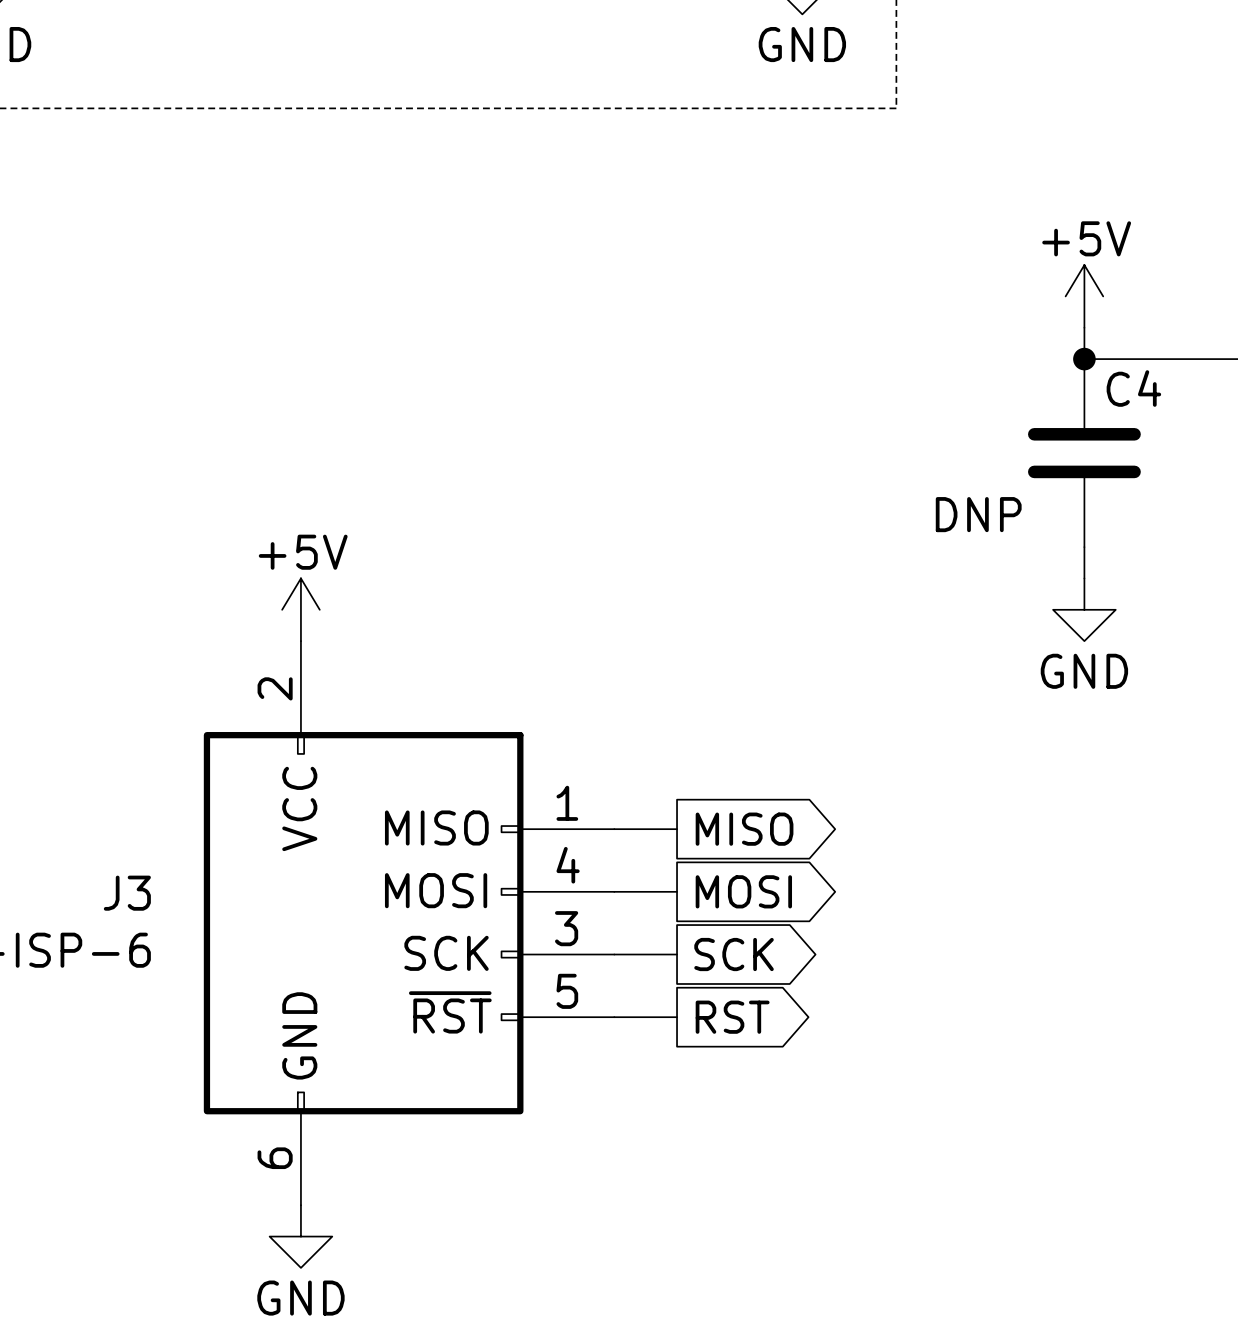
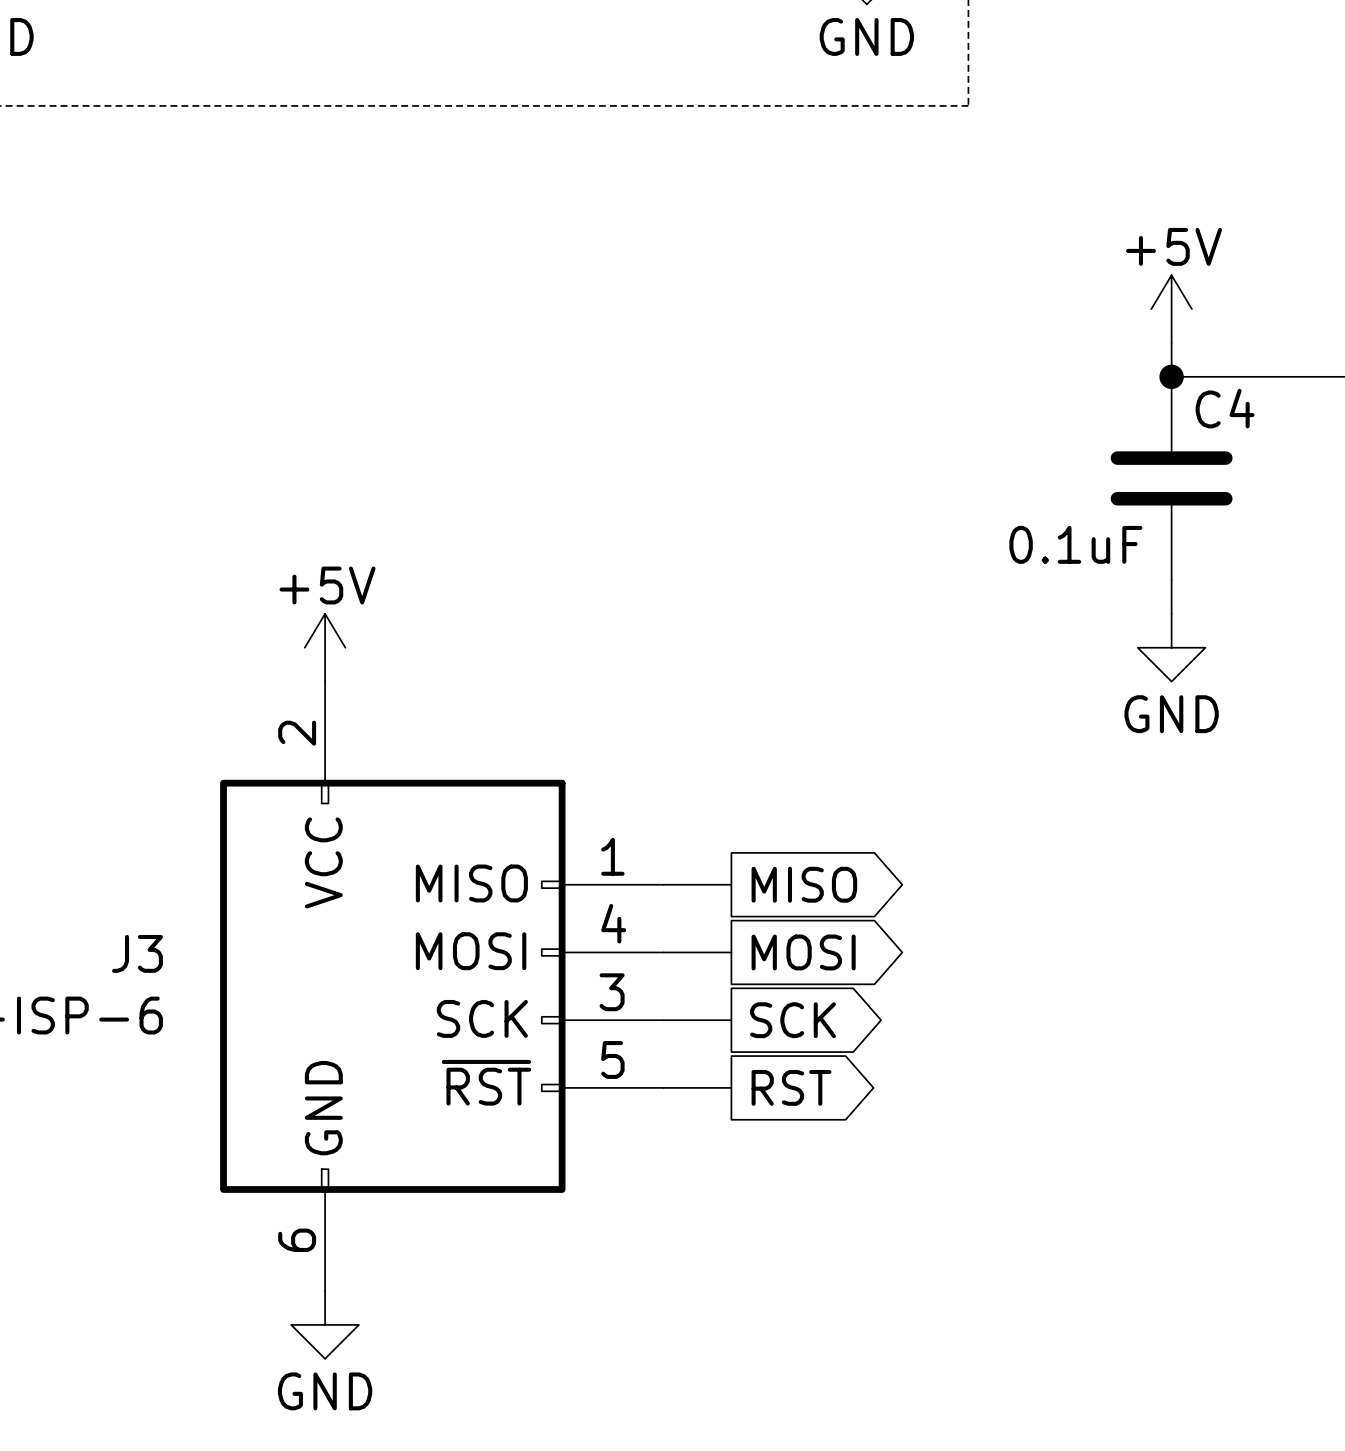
C4 value: DNP (978, 514) -> 0.1uF (1075, 544)

